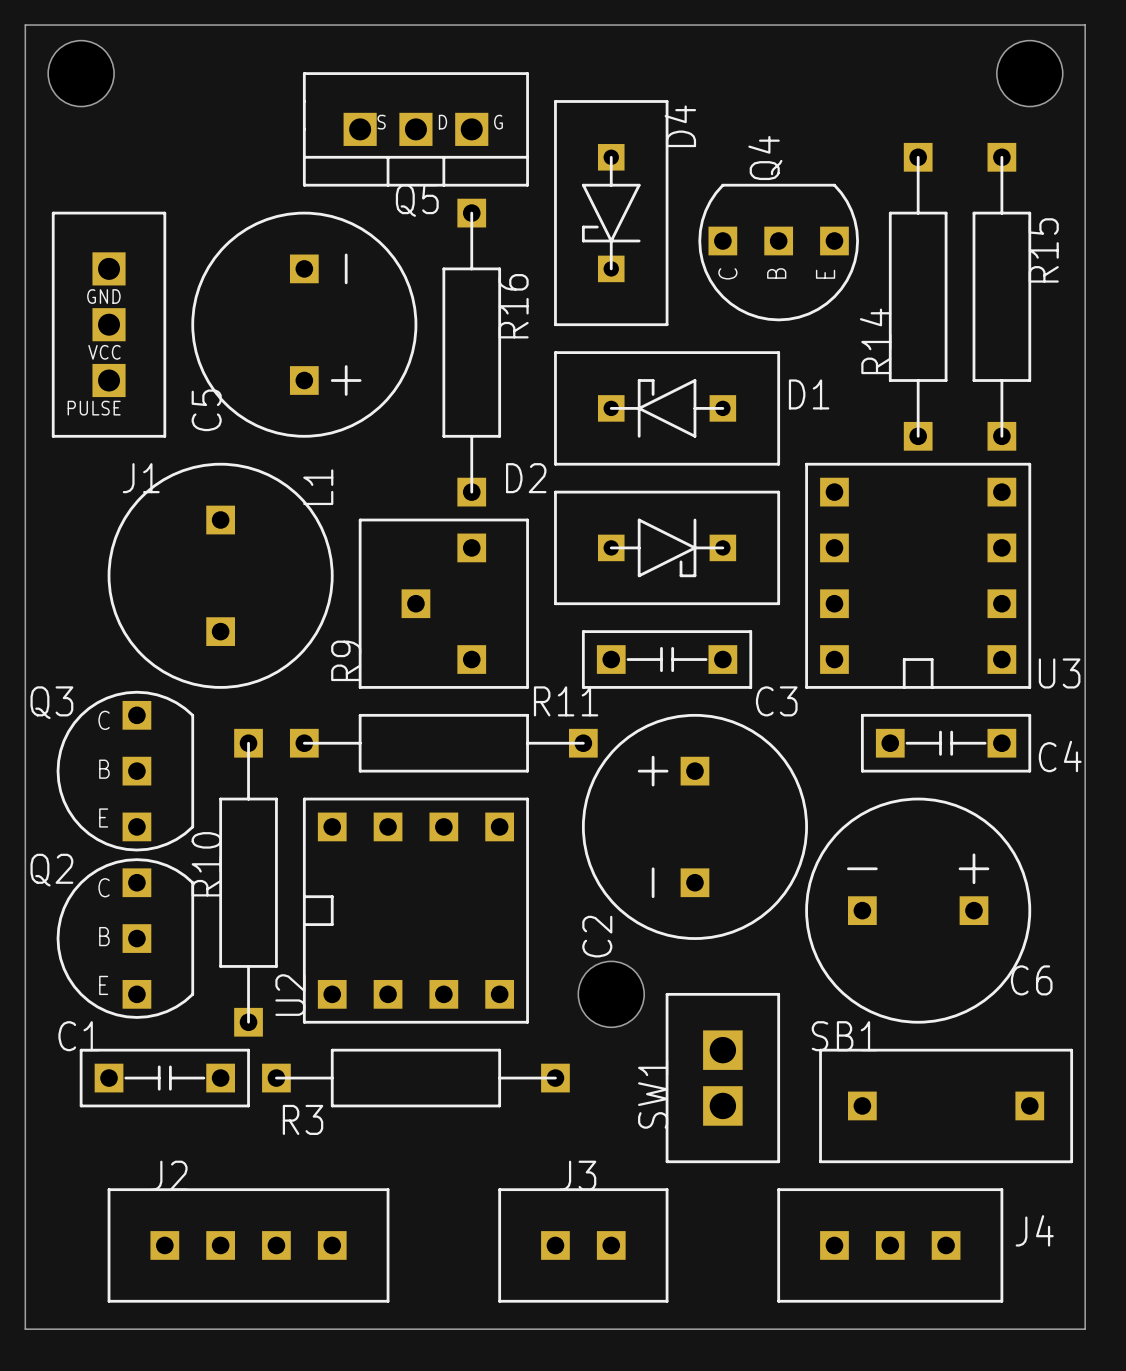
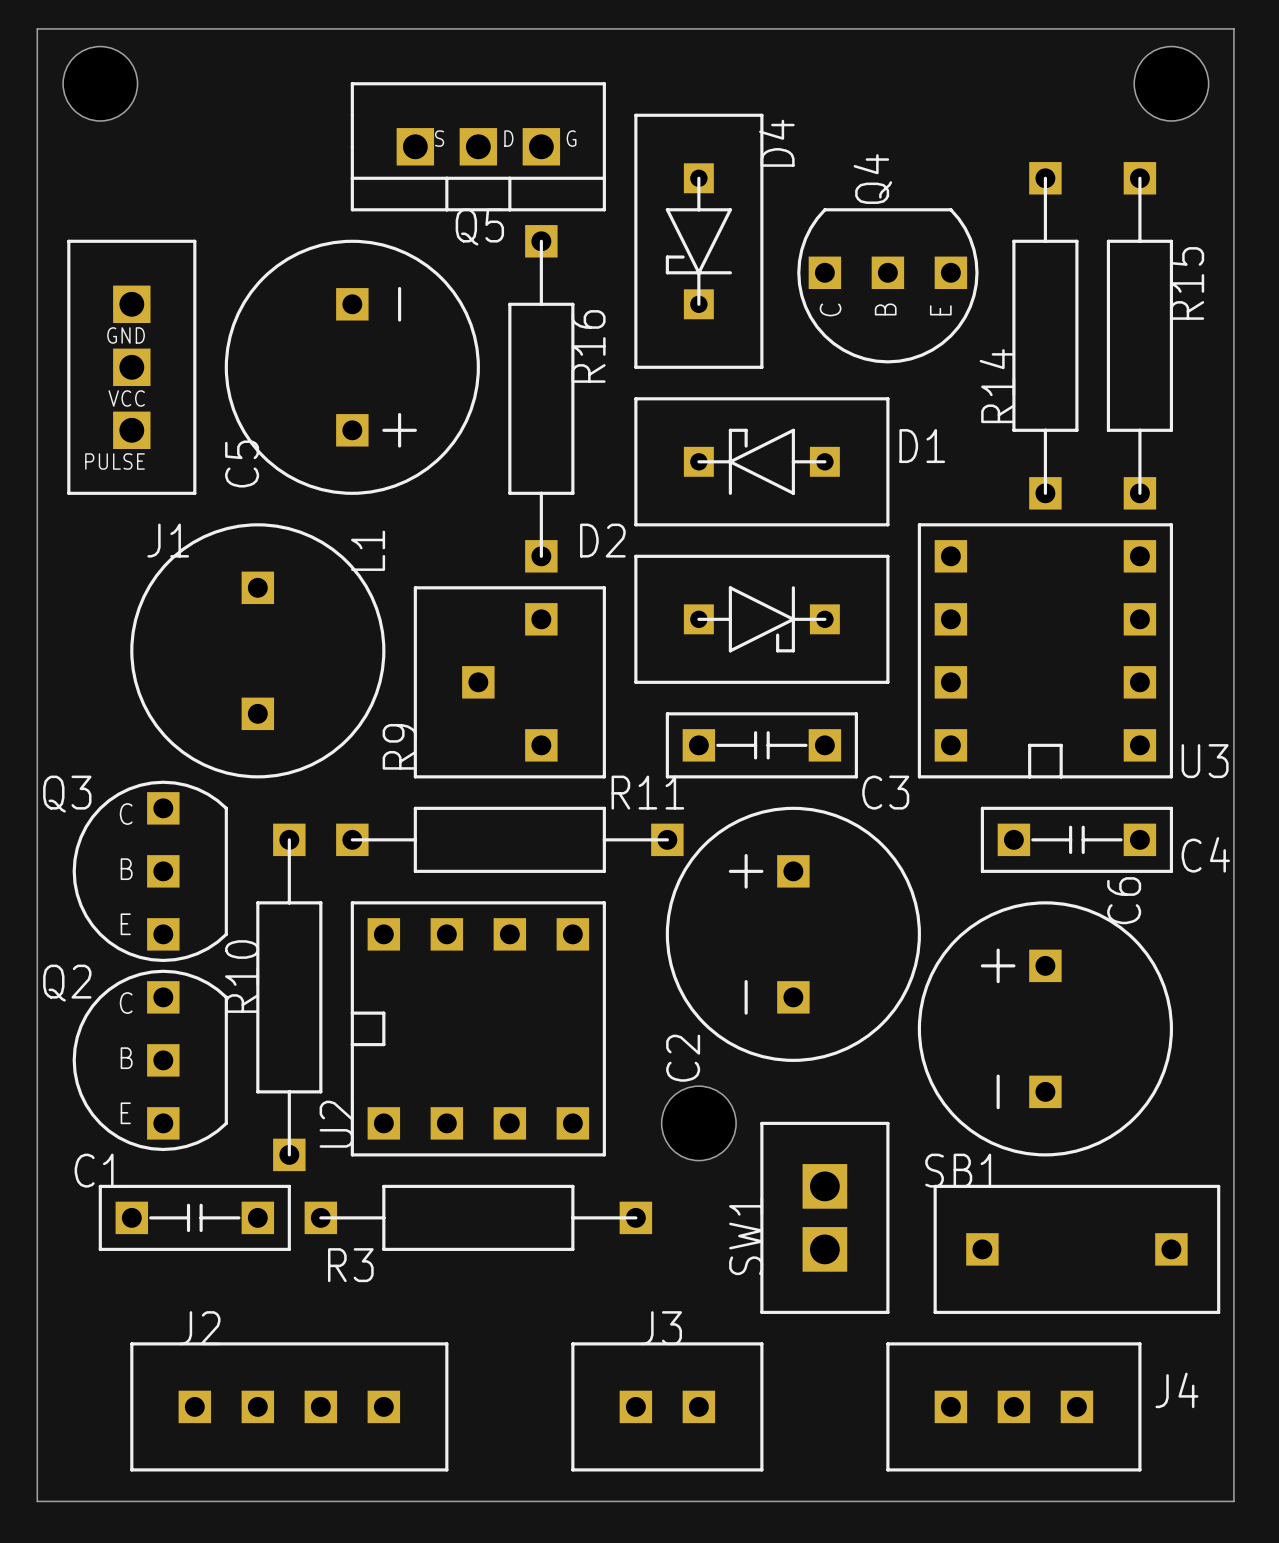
C6 rotation: 0° (918, 910) -> 90° counterclockwise (1045, 1028)

